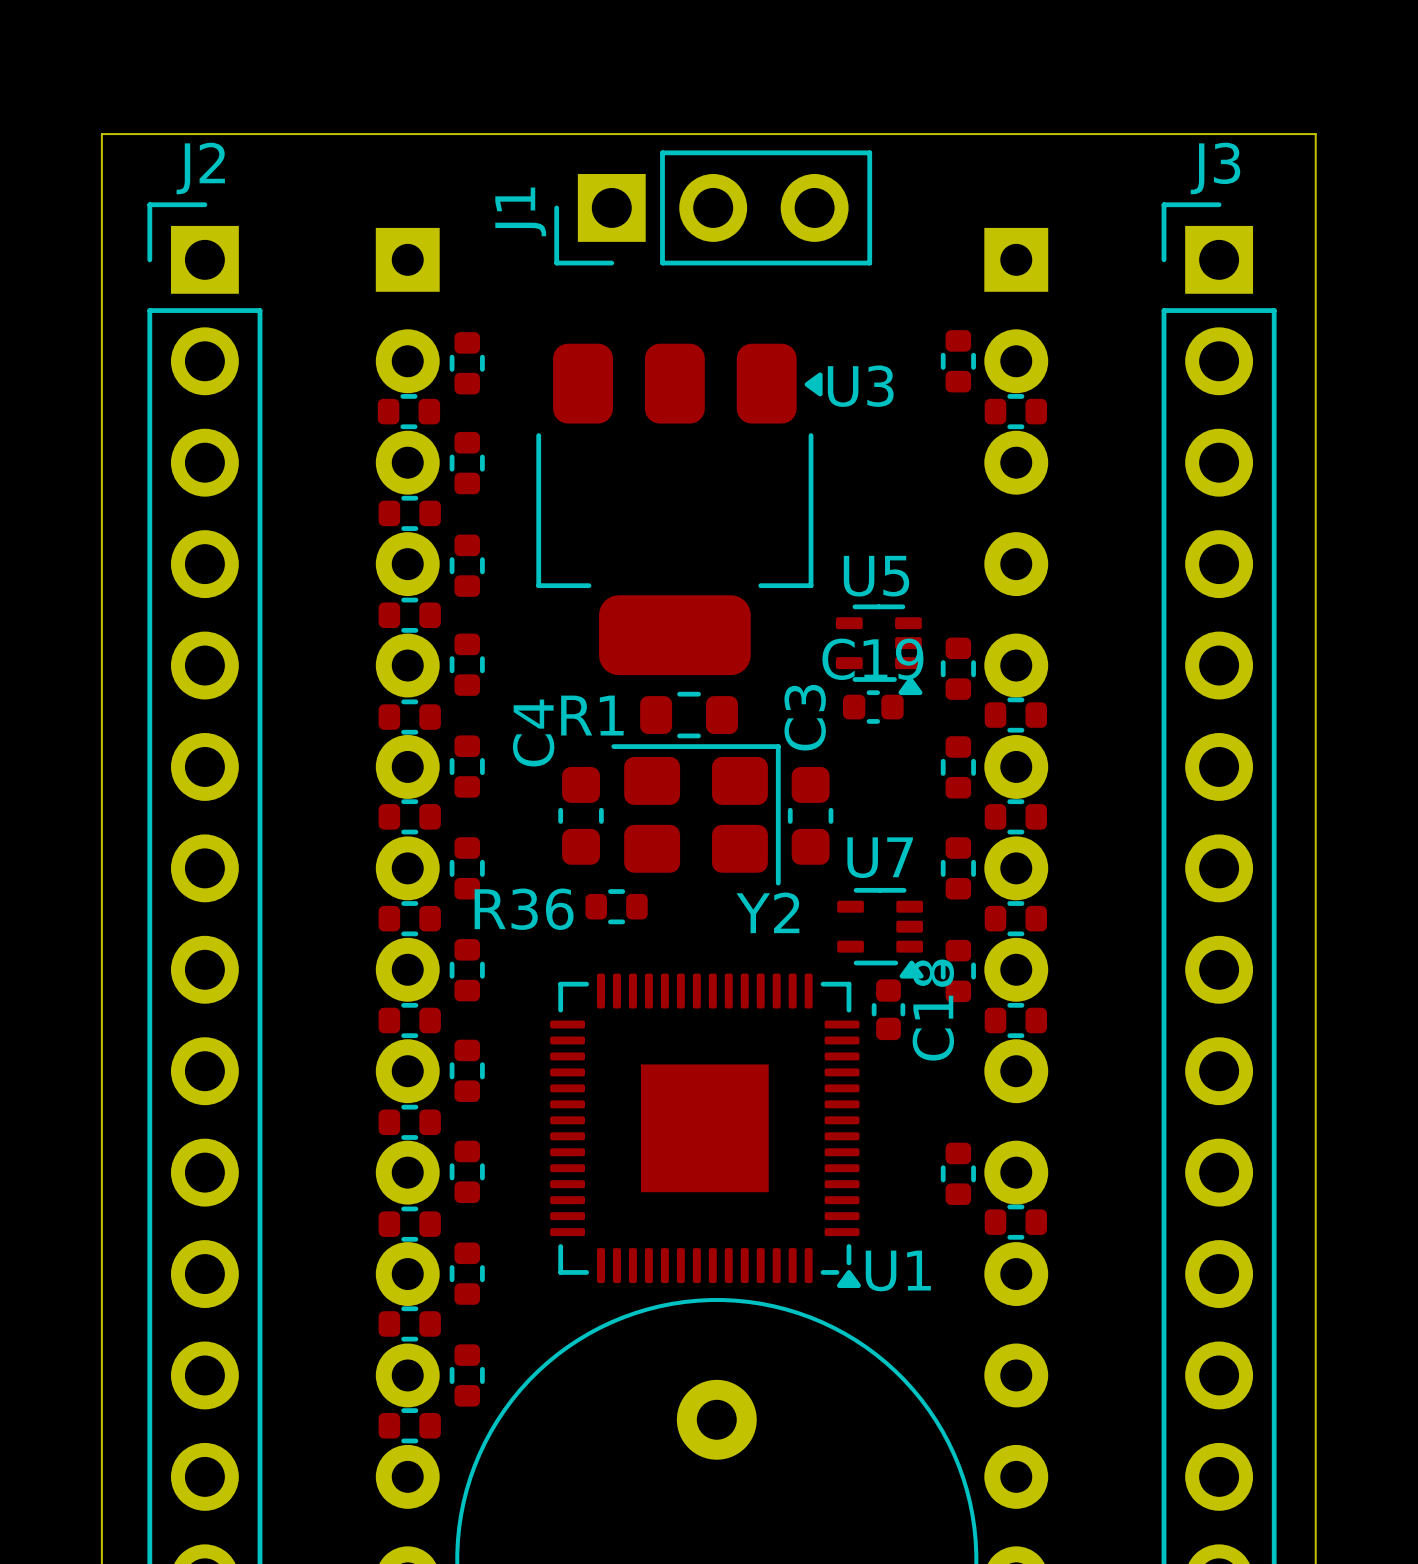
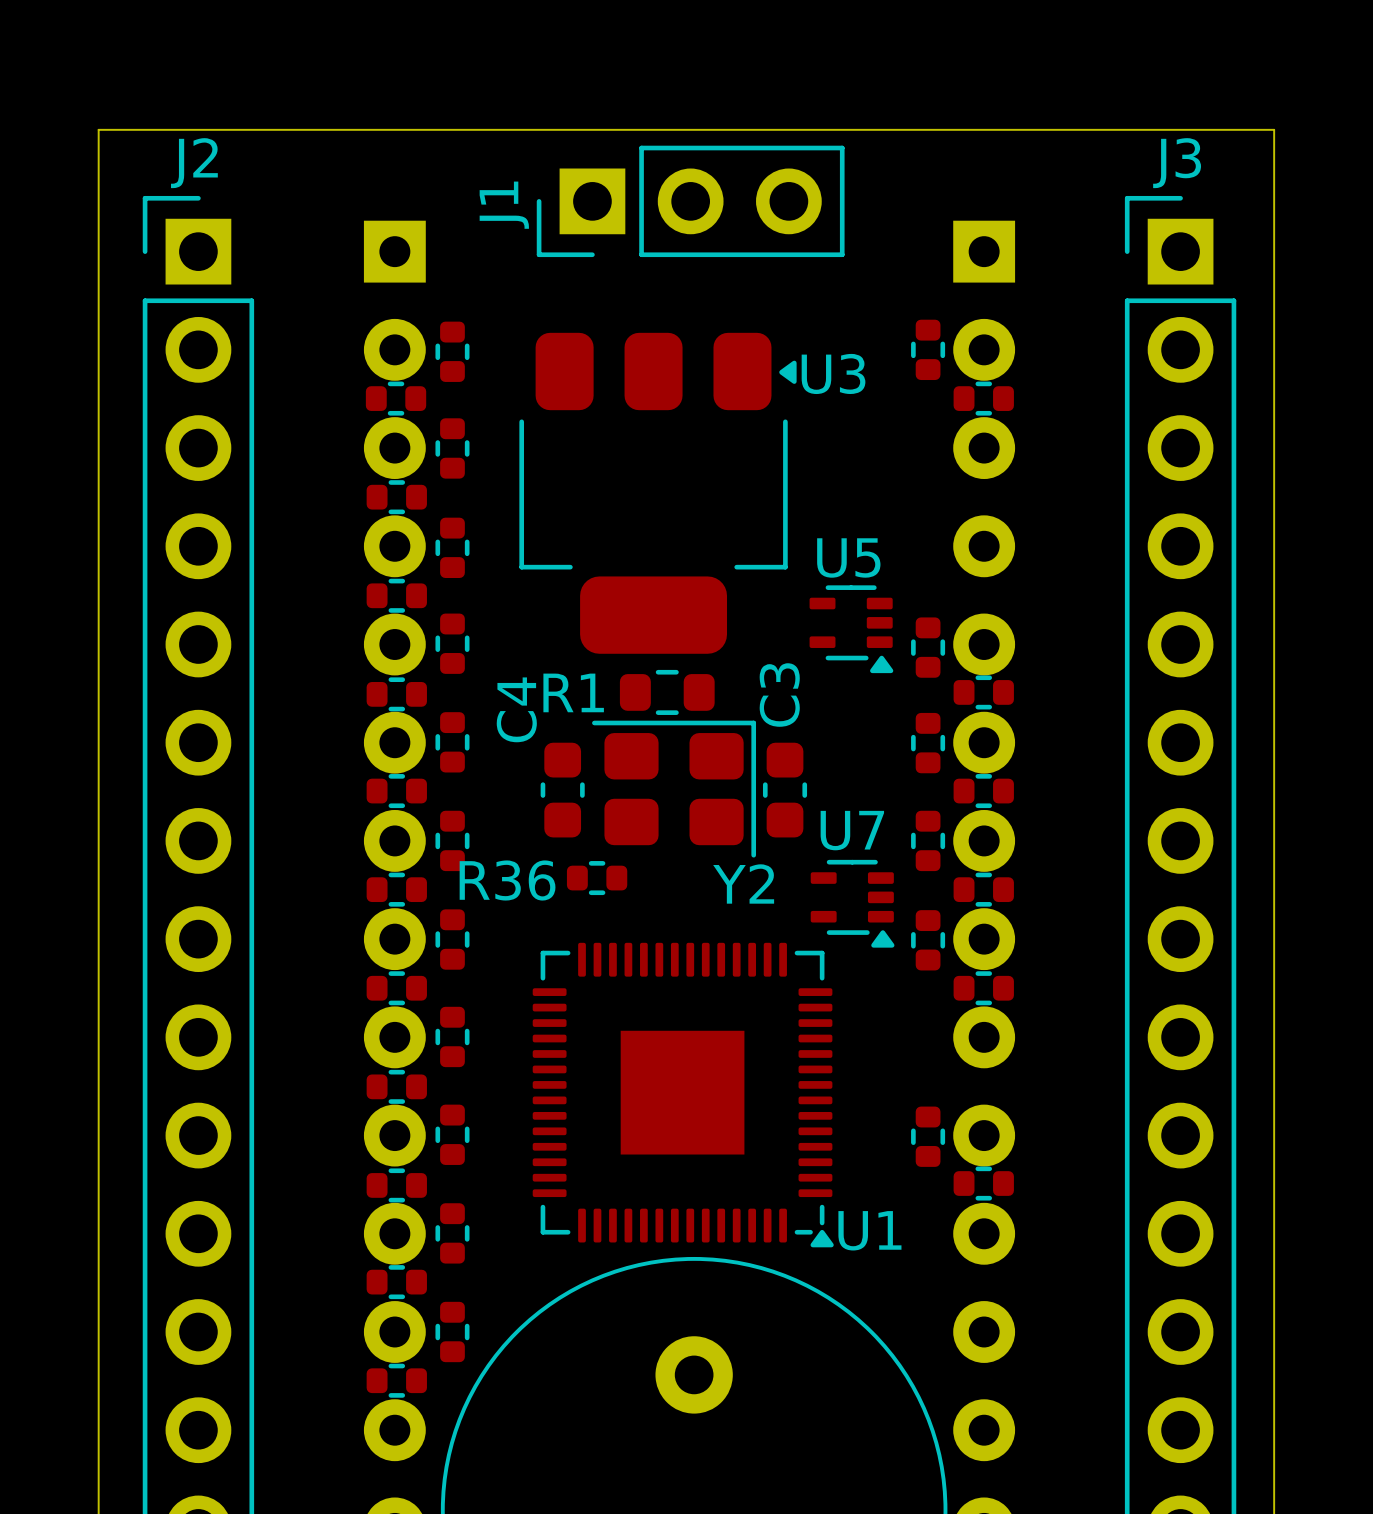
C19: (873, 707) -> none
C18: (888, 1009) -> none

